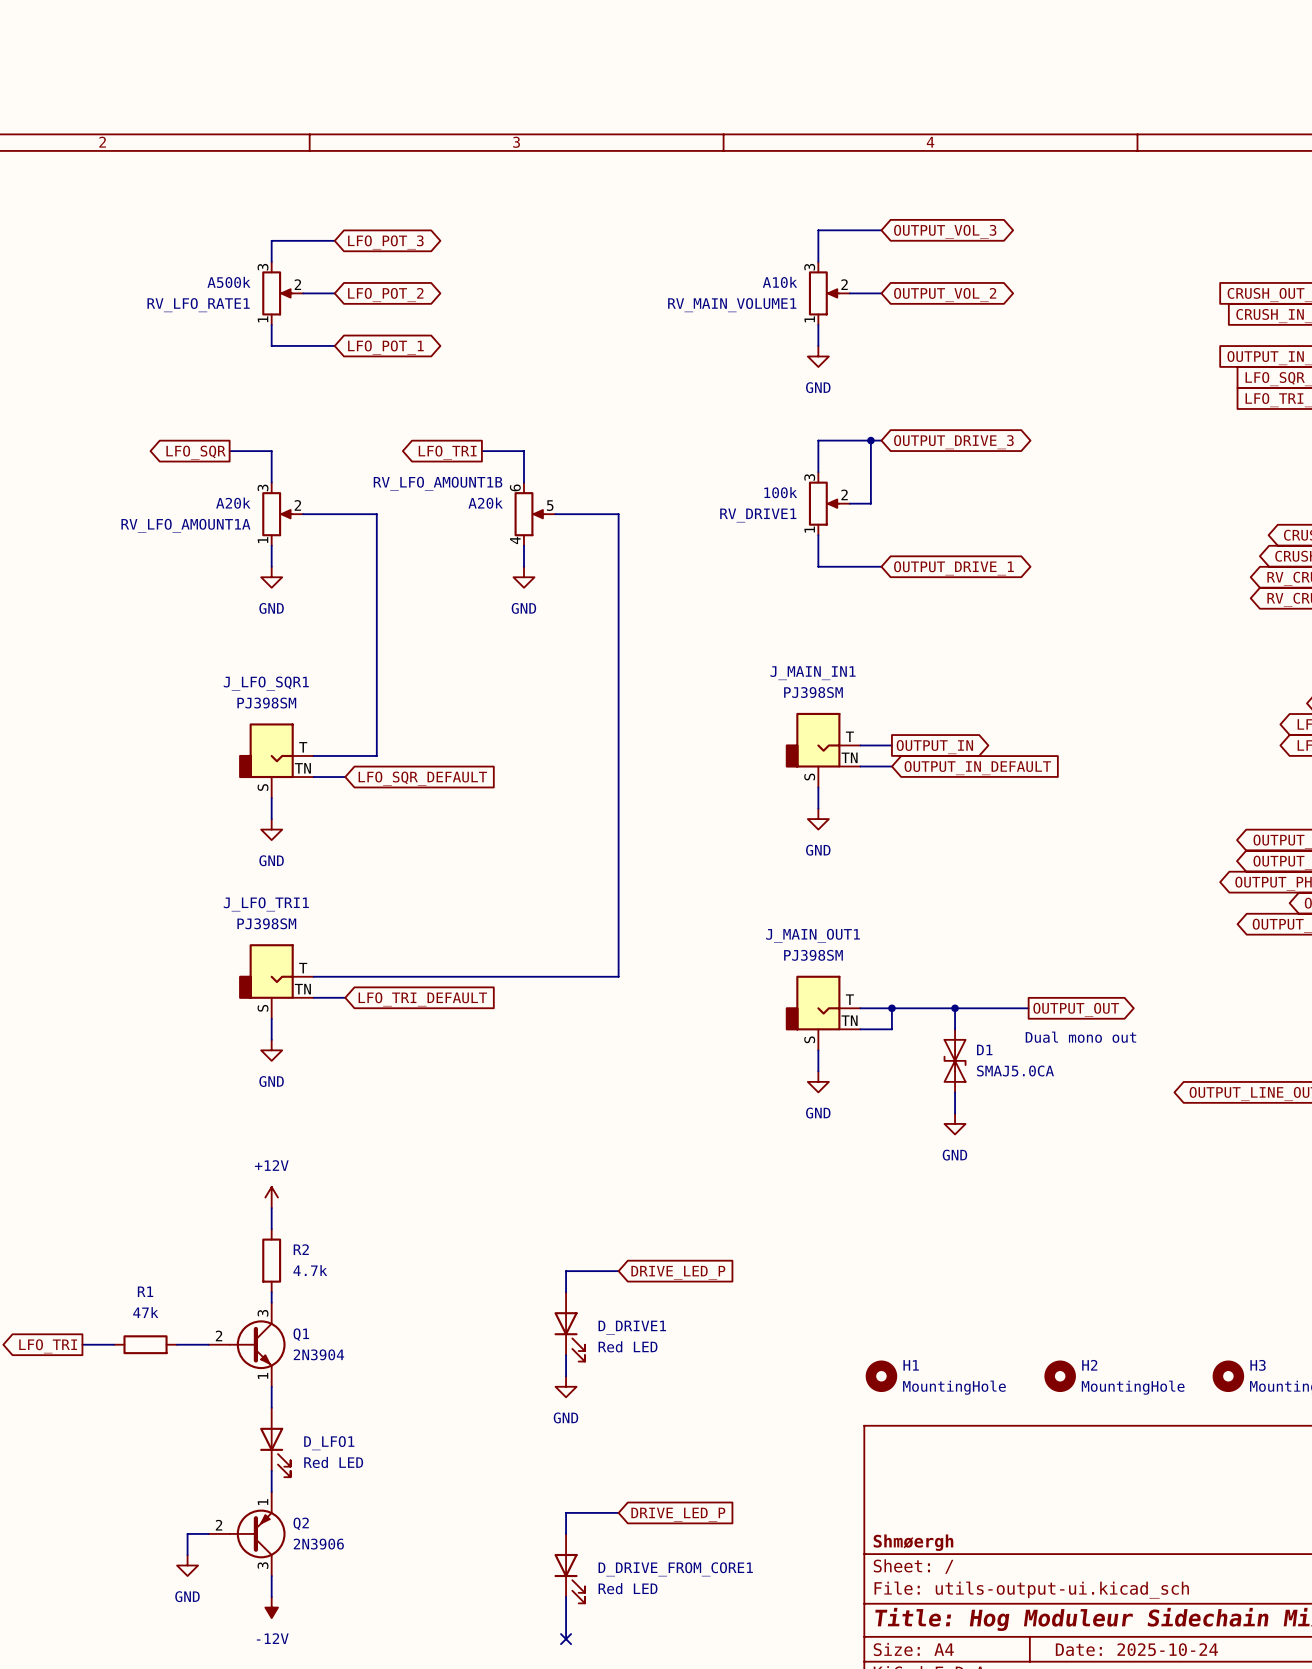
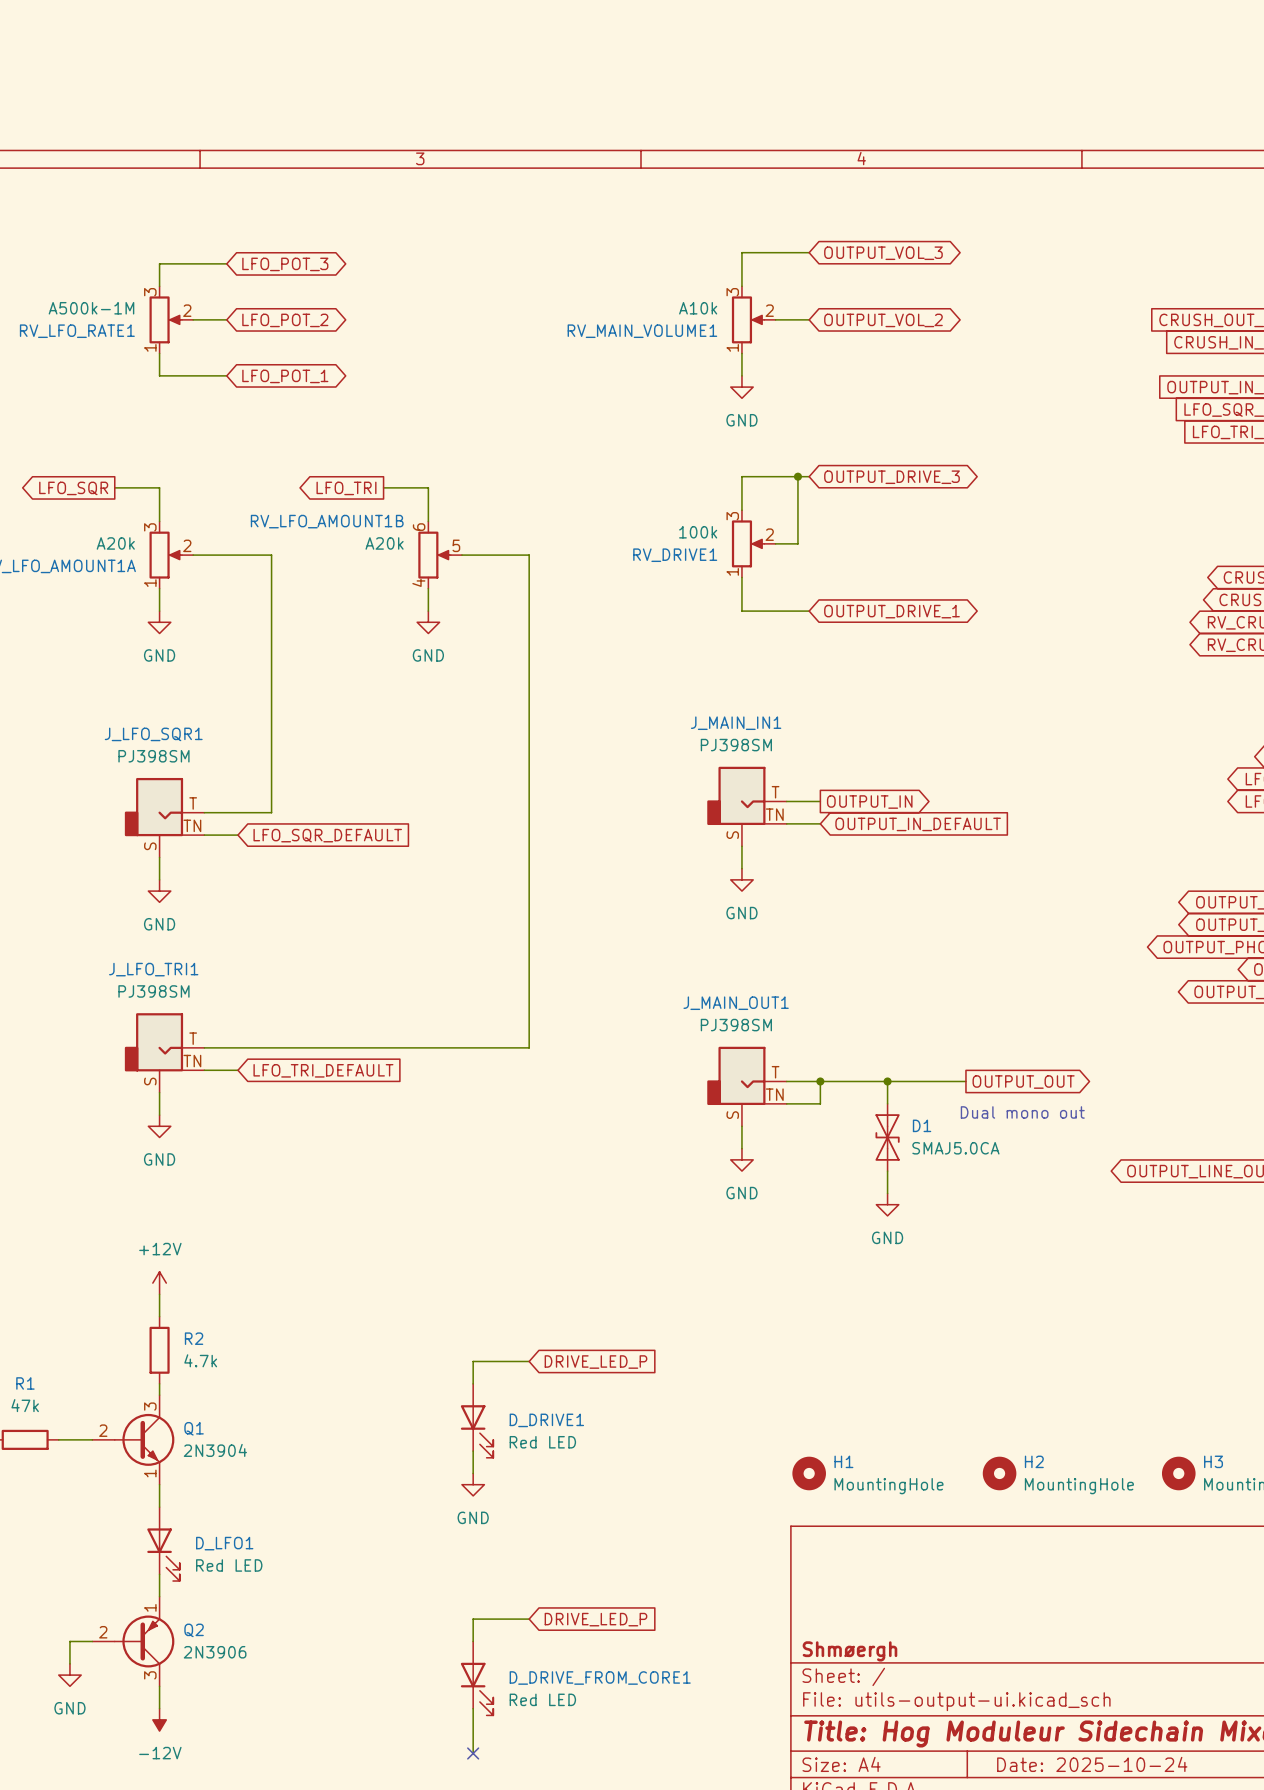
RV_LFO_RATE1 value: A500k (228, 282) -> A500k-1M (91, 308)

